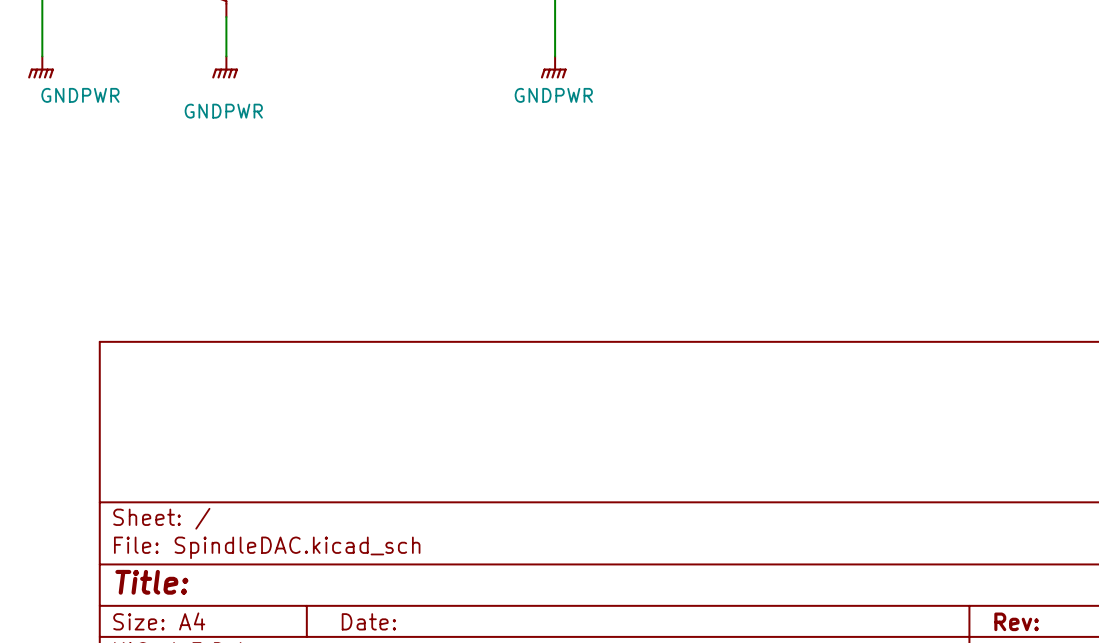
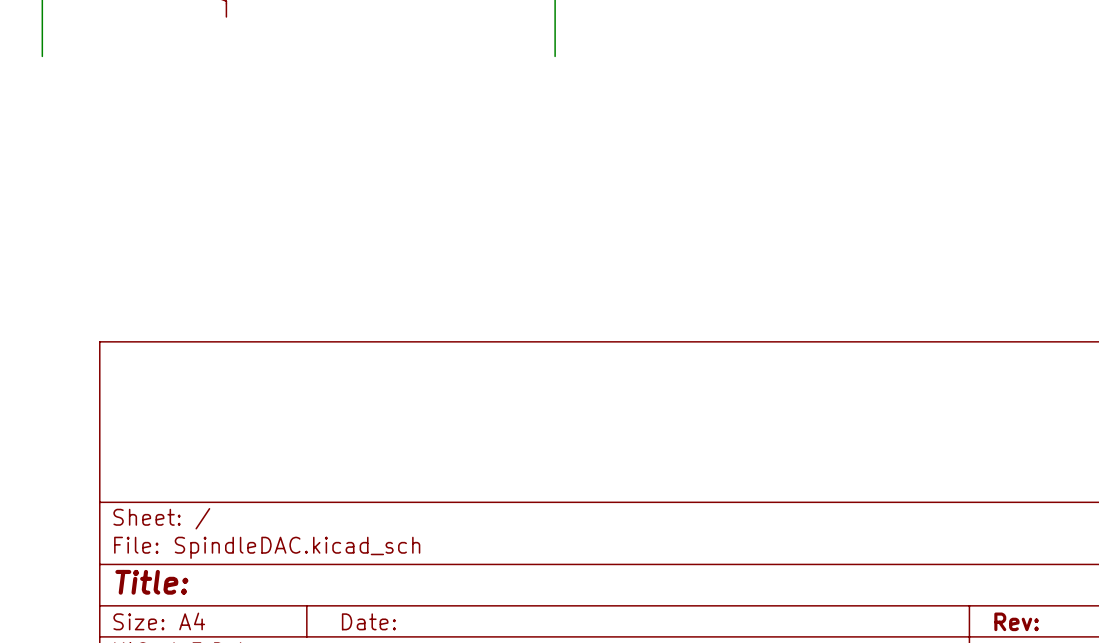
wire: (226, 16) (226, 56) -> none
power symbol: GNDPWR (41, 67) -> none
power symbol: GNDPWR (225, 67) -> none
power symbol: GNDPWR (553, 67) -> none

